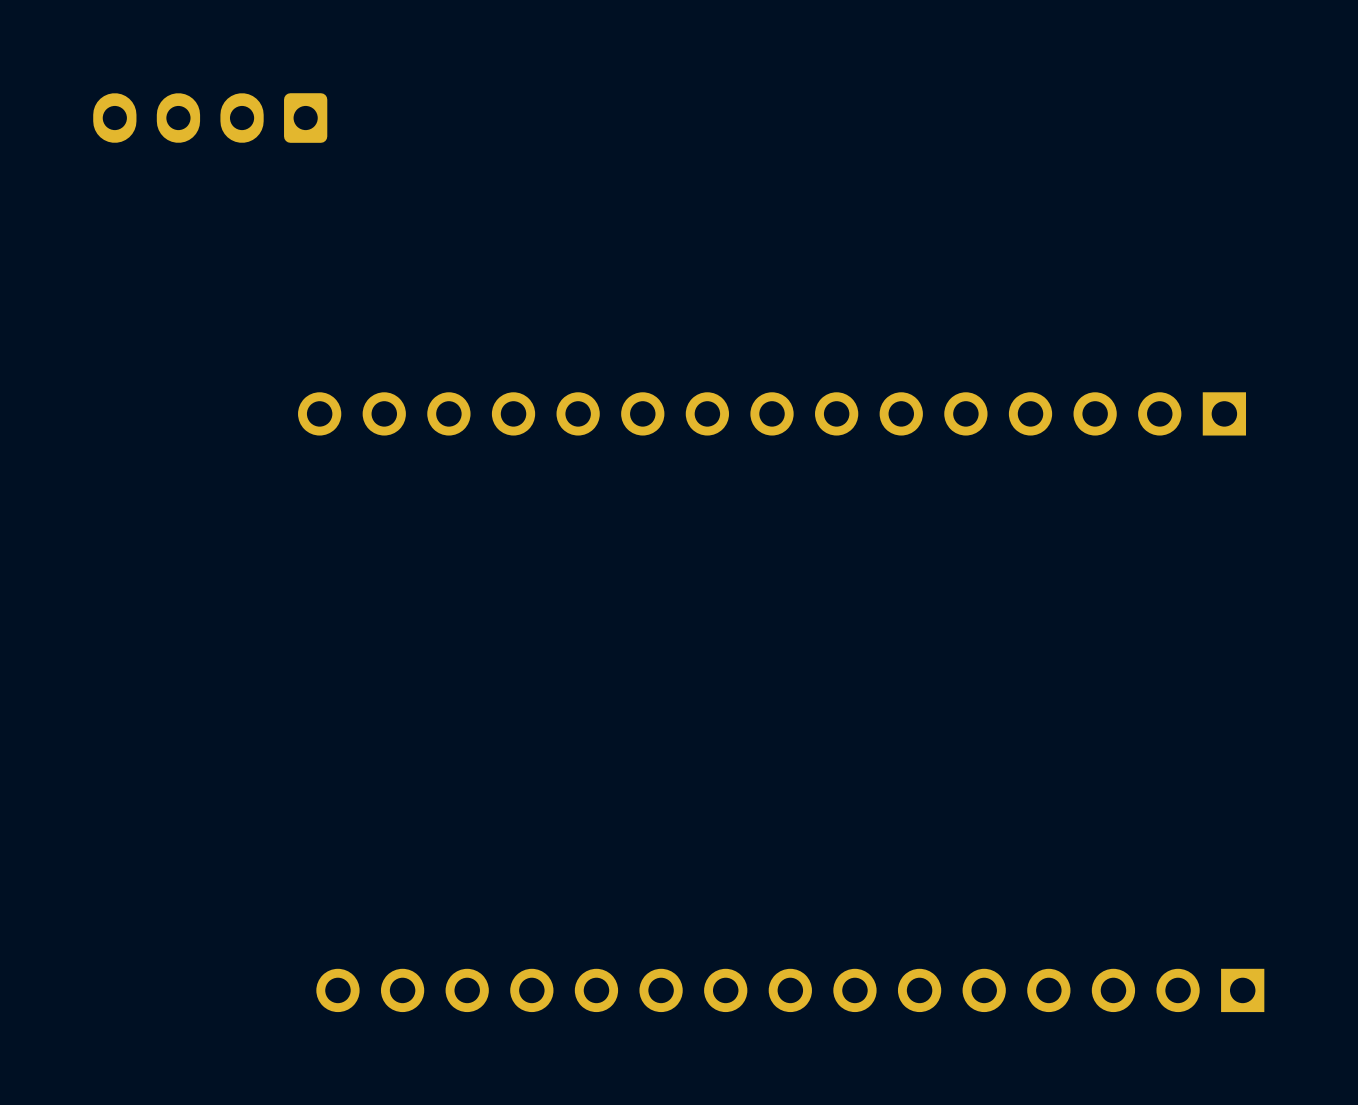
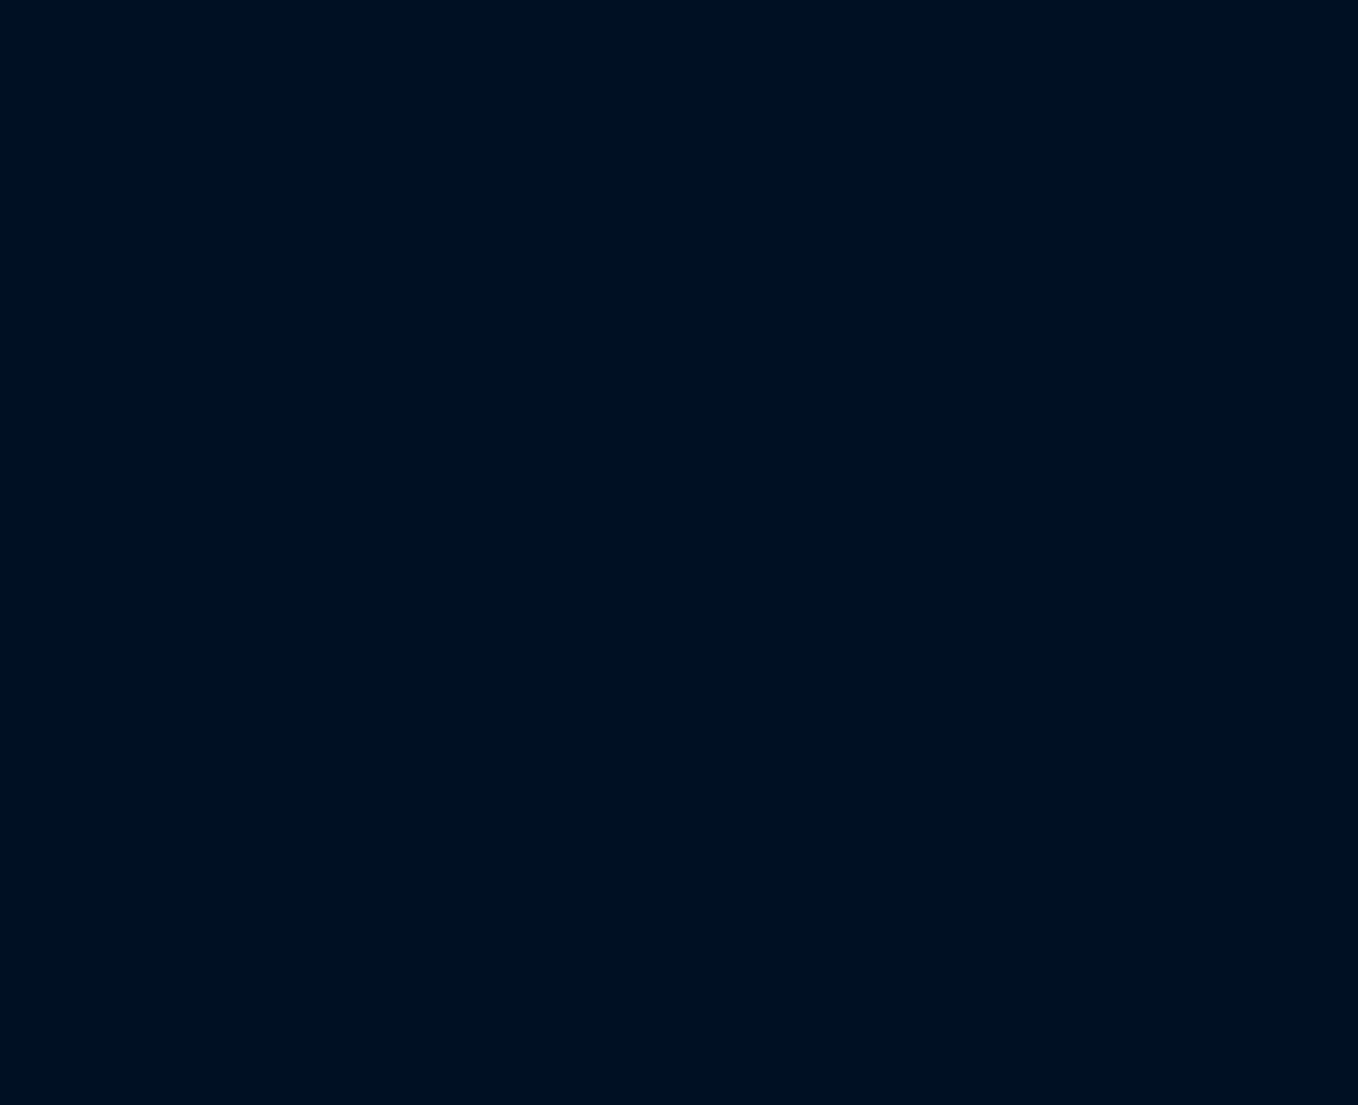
part: (210, 118) -> none
part: (772, 413) -> none
part: (790, 990) -> none

